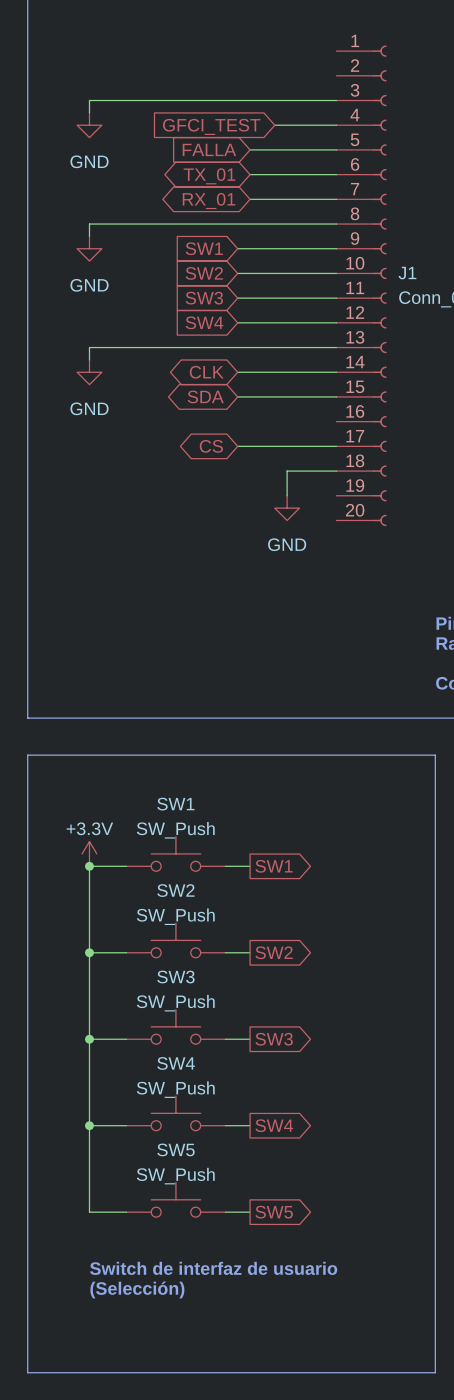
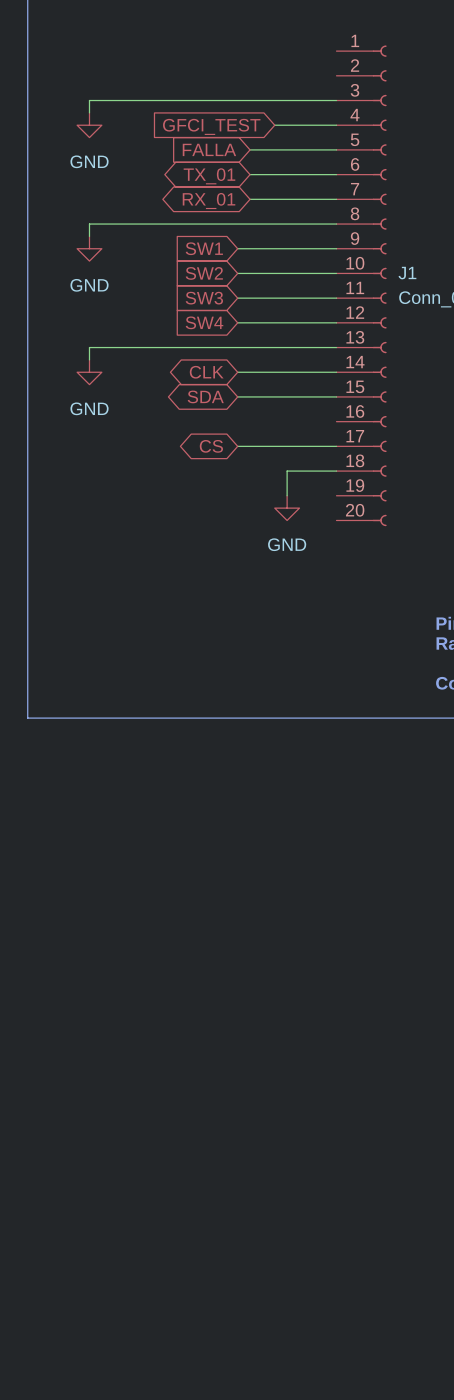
line: (27, 755) (435, 755) (435, 1372) (27, 1372) (27, 755) -> none
power symbol: +3.3V (89, 853) -> none
SW1: SW_Push (175, 853) -> none
junction: (89, 866) -> none
wire: (126, 866) (89, 866) (89, 1212) (126, 1212) -> none
wire: (225, 866) (250, 866) -> none
global label: SW1 (274, 866) -> none
SW2: SW_Push (175, 940) -> none
wire: (89, 952) (126, 952) -> none
junction: (89, 952) -> none
wire: (225, 952) (250, 952) -> none
global label: SW2 (274, 952) -> none
SW3: SW_Push (175, 1026) -> none
wire: (89, 1039) (126, 1039) -> none
junction: (89, 1039) -> none
wire: (225, 1039) (250, 1039) -> none
global label: SW3 (274, 1039) -> none
SW4: SW_Push (175, 1113) -> none
wire: (89, 1125) (126, 1125) -> none
junction: (89, 1125) -> none
wire: (225, 1125) (250, 1125) -> none
global label: SW4 (274, 1125) -> none
SW5: SW_Push (175, 1199) -> none
wire: (225, 1212) (250, 1212) -> none
global label: SW5 (274, 1212) -> none
text: Switch de interfaz de usuario (213, 1268) -> none
text: (Selección) (137, 1289) -> none

